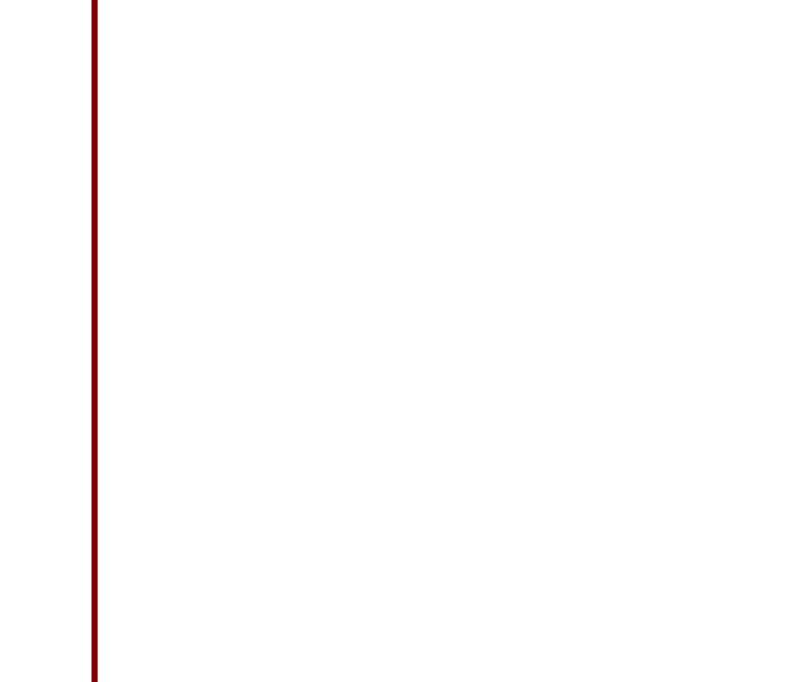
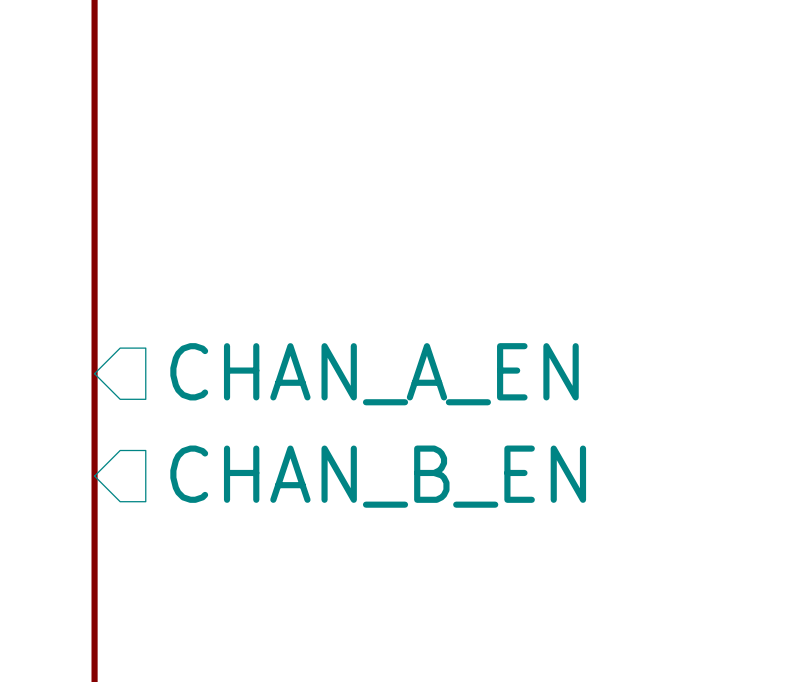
sheet pin: none -> CHAN_A_EN (374, 374)
sheet pin: none -> CHAN_B_EN (378, 476)

